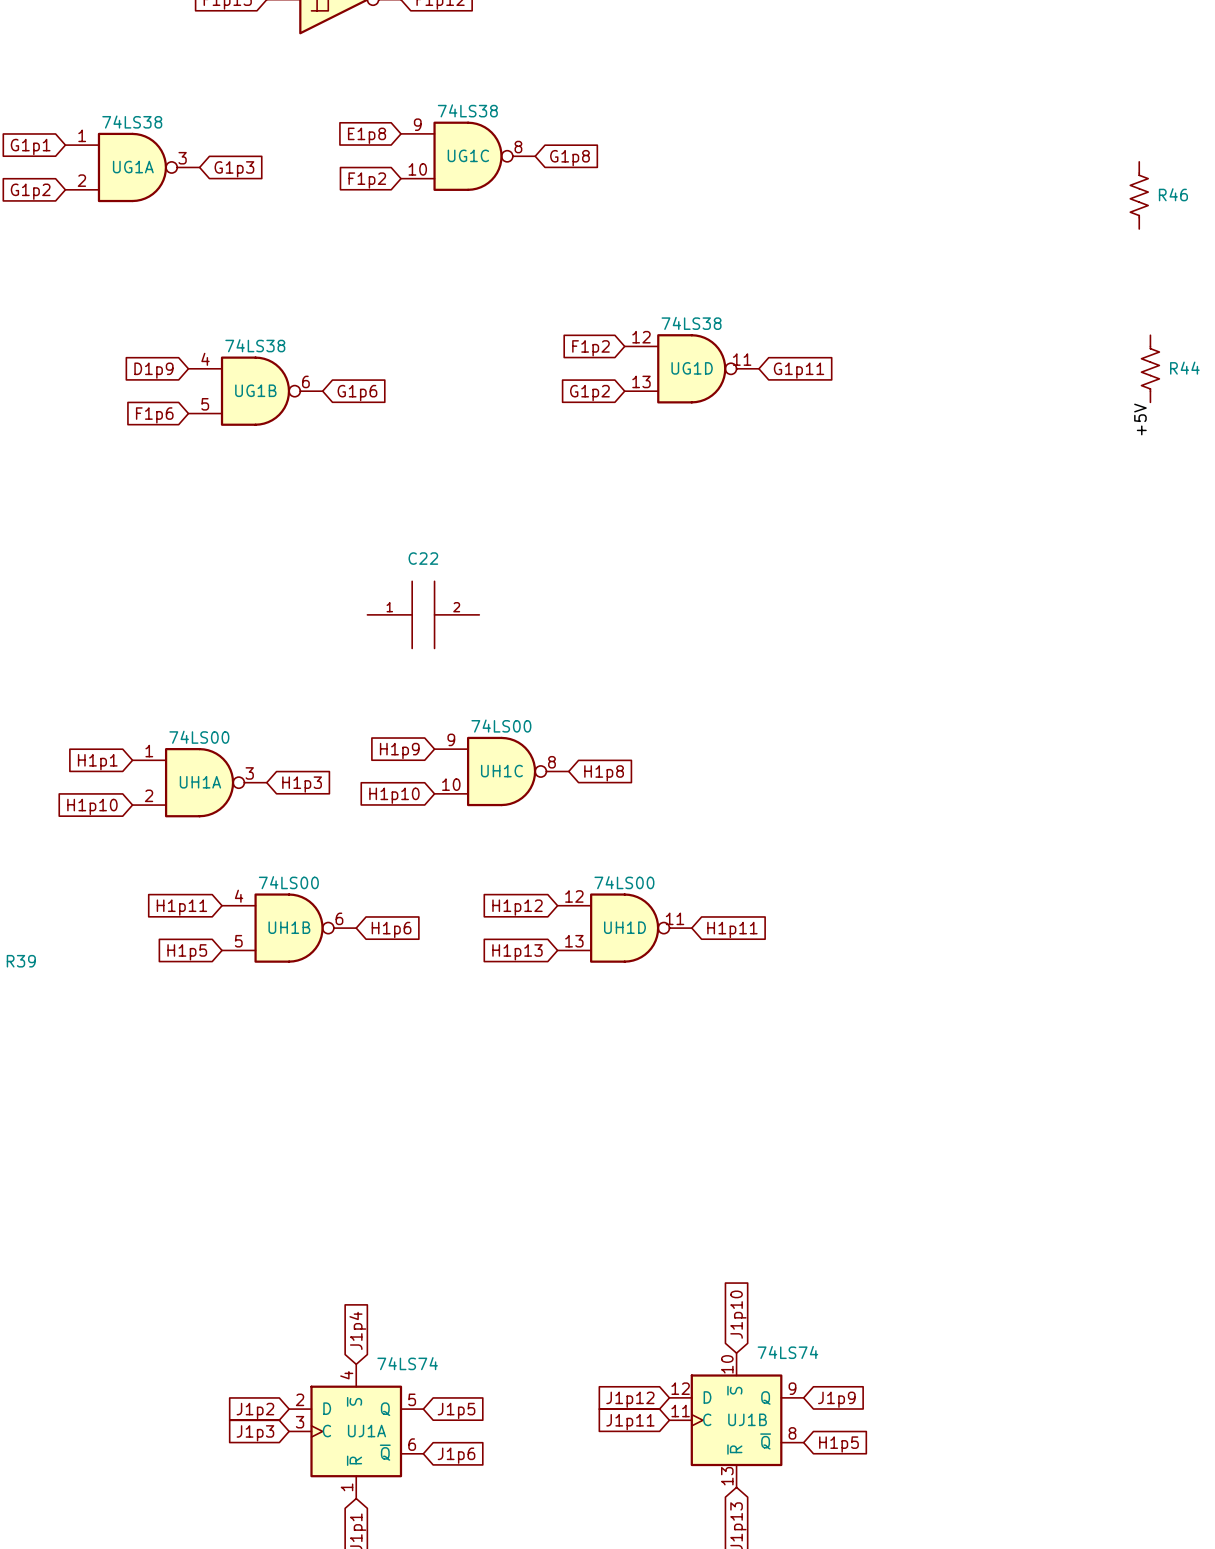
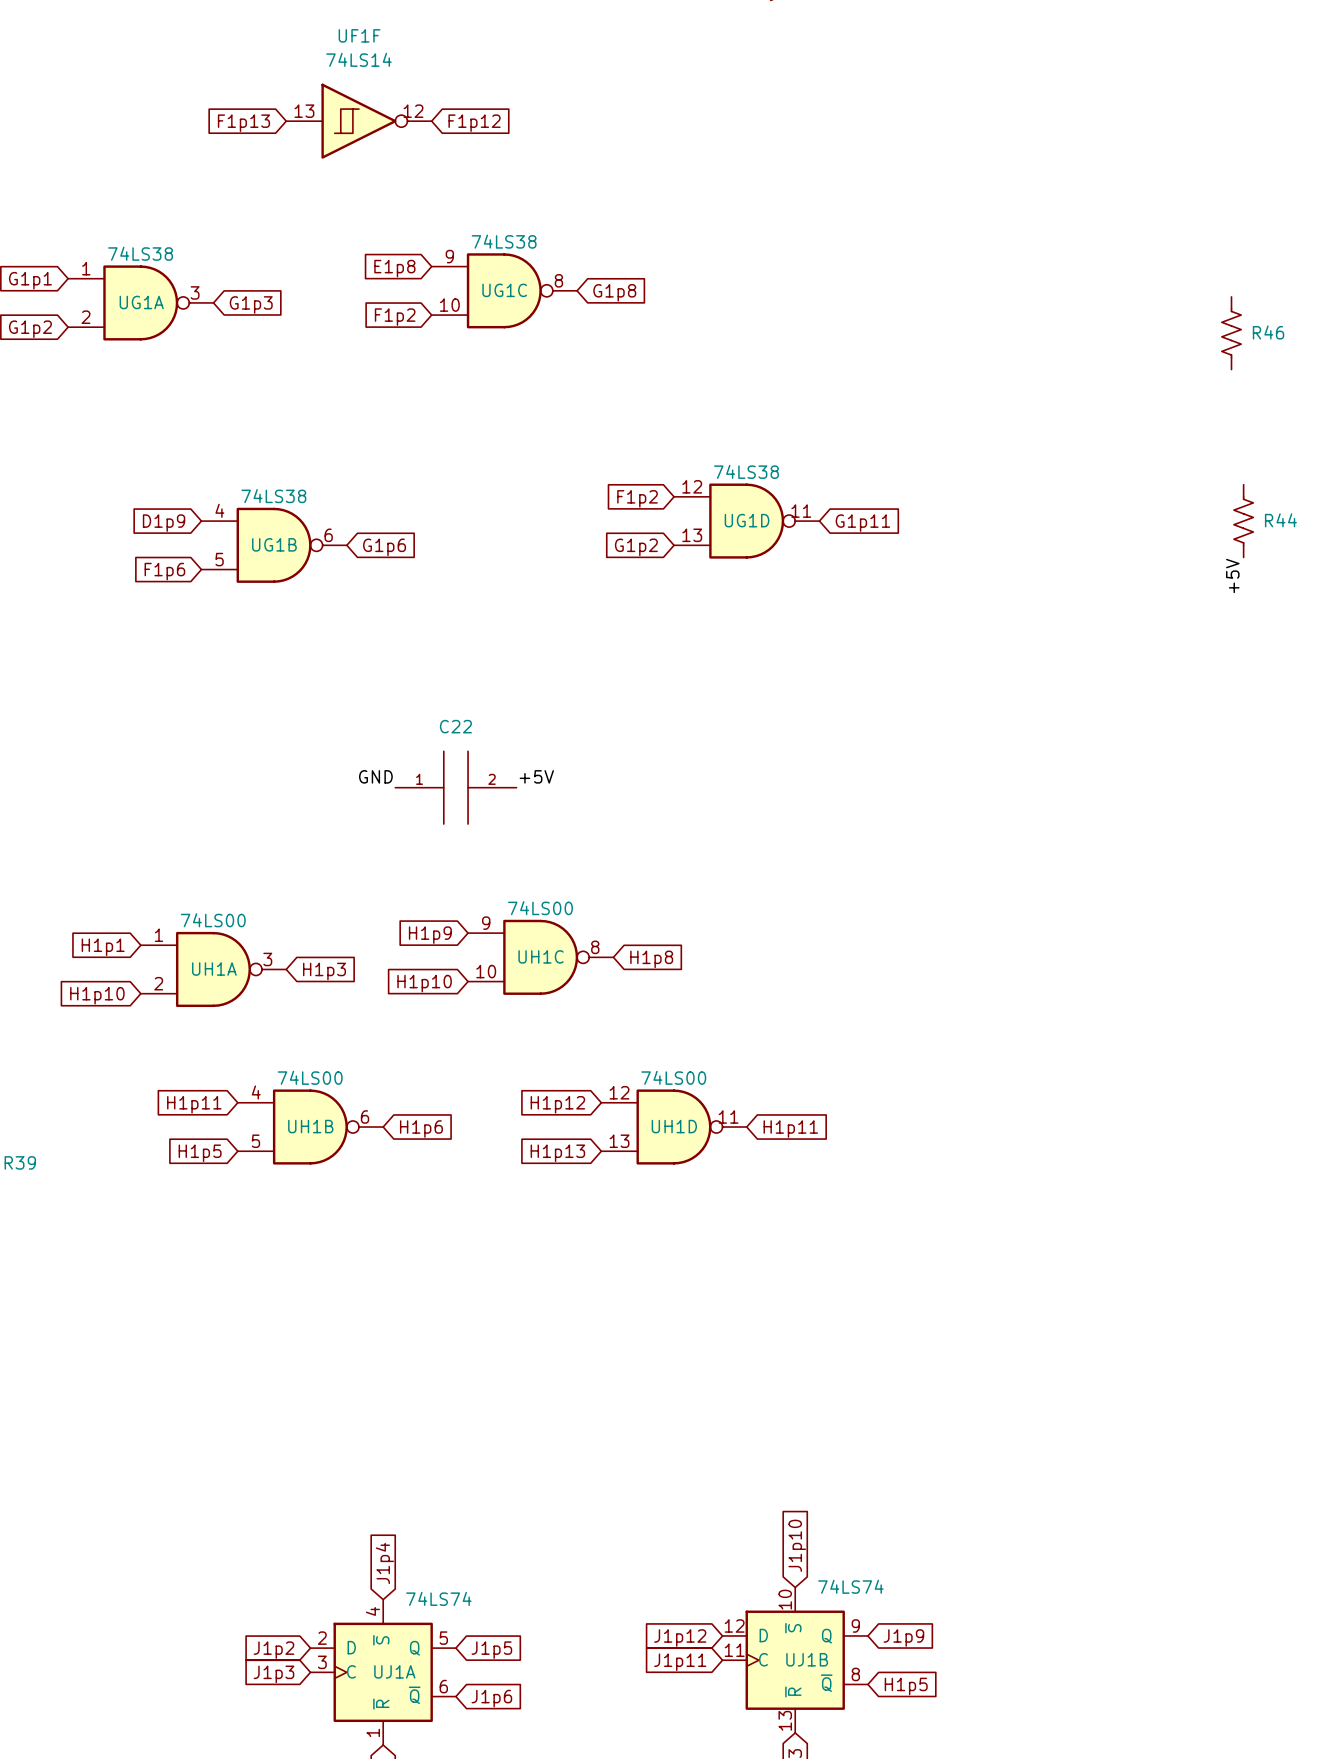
label: none -> GND (375, 776)
label: none -> +5V (536, 776)

